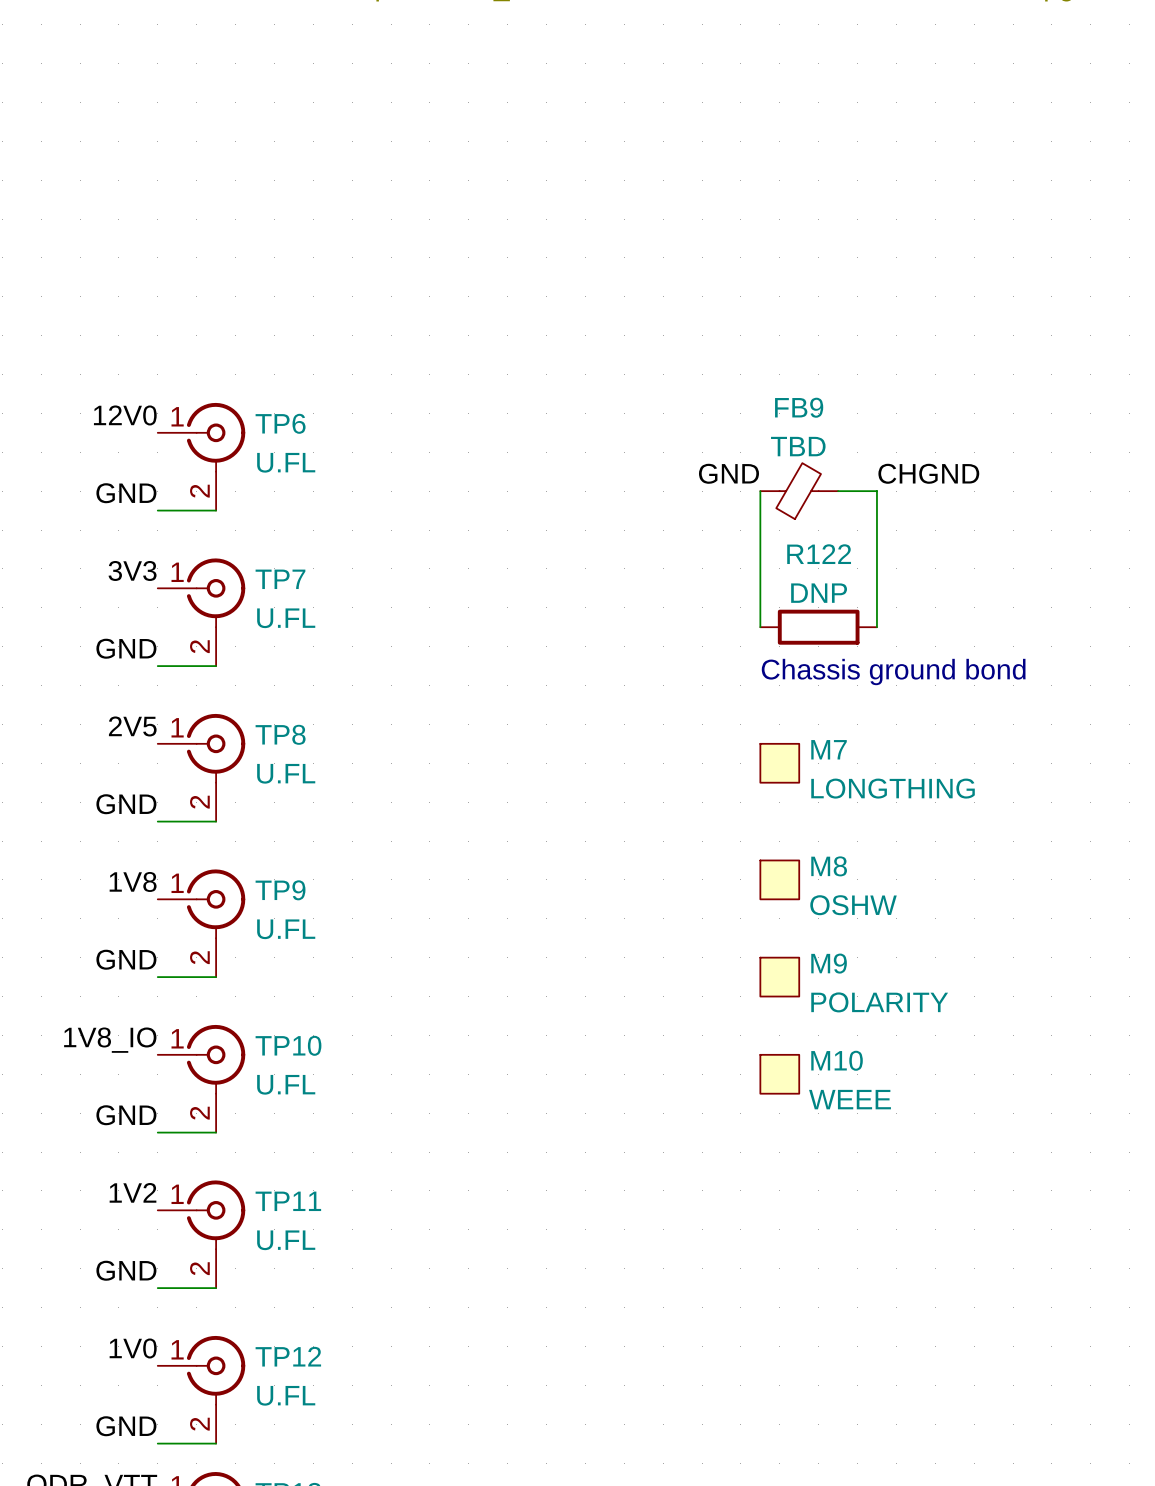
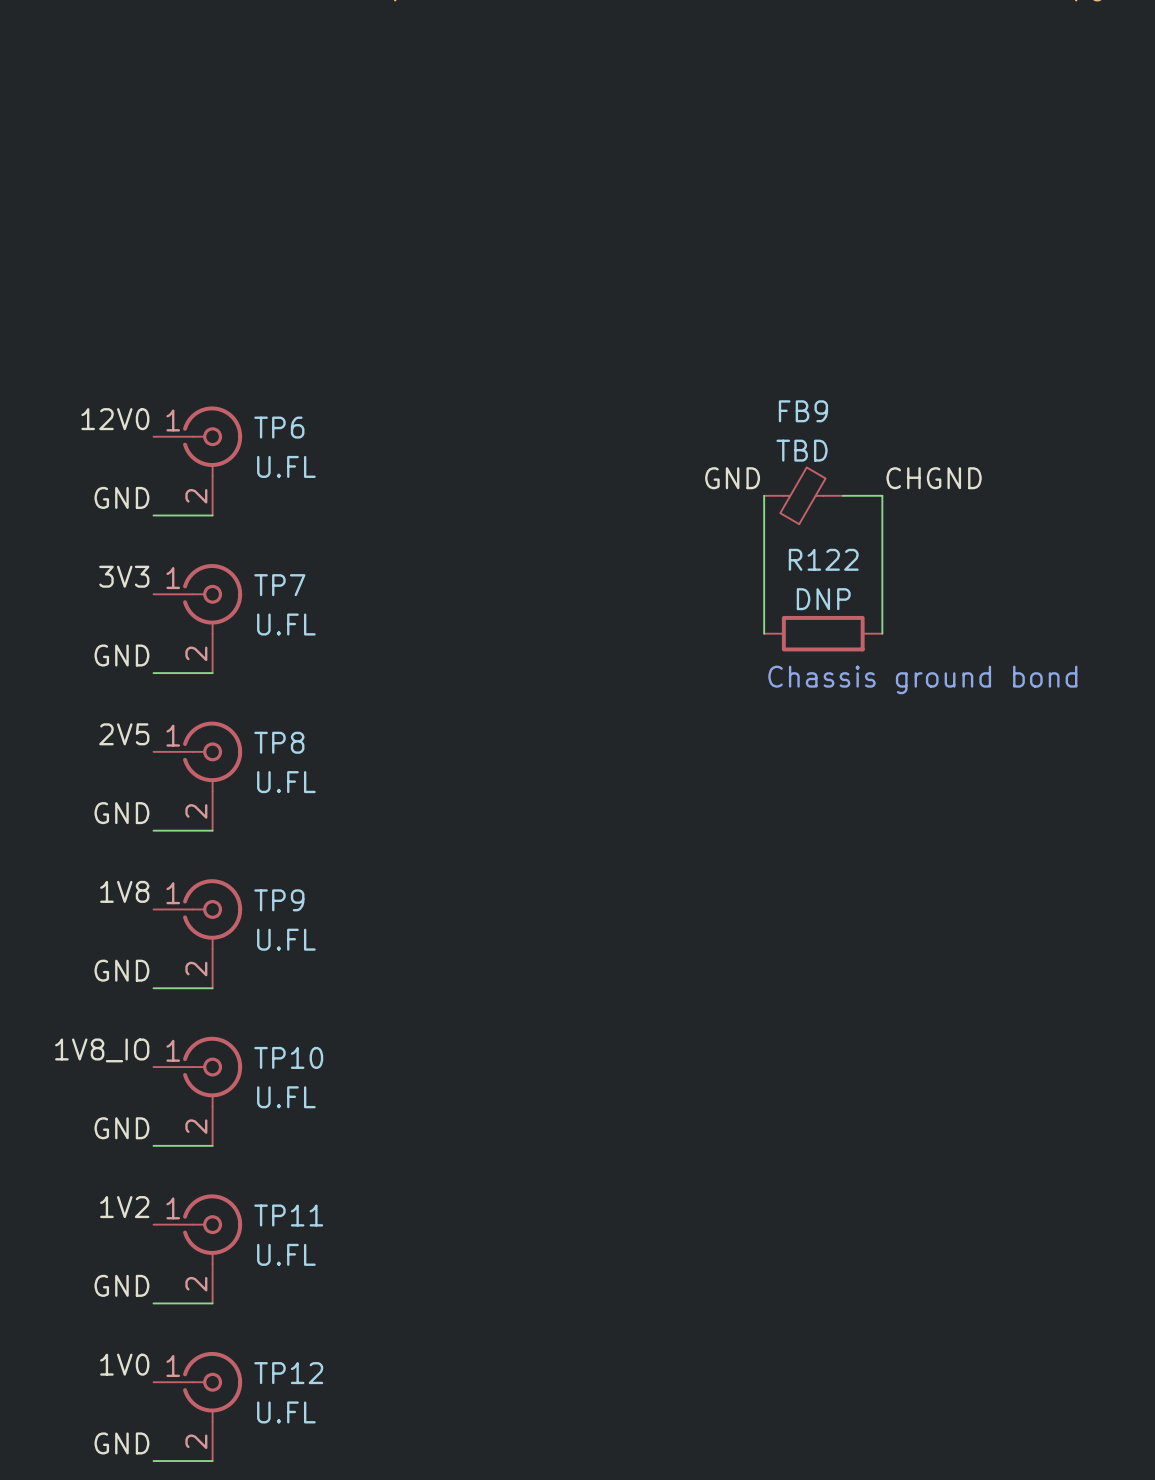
M7: LONGTHING (779, 763) -> none
M8: OSHW (779, 879) -> none
M9: POLARITY (779, 977) -> none
M10: WEEE (779, 1074) -> none

